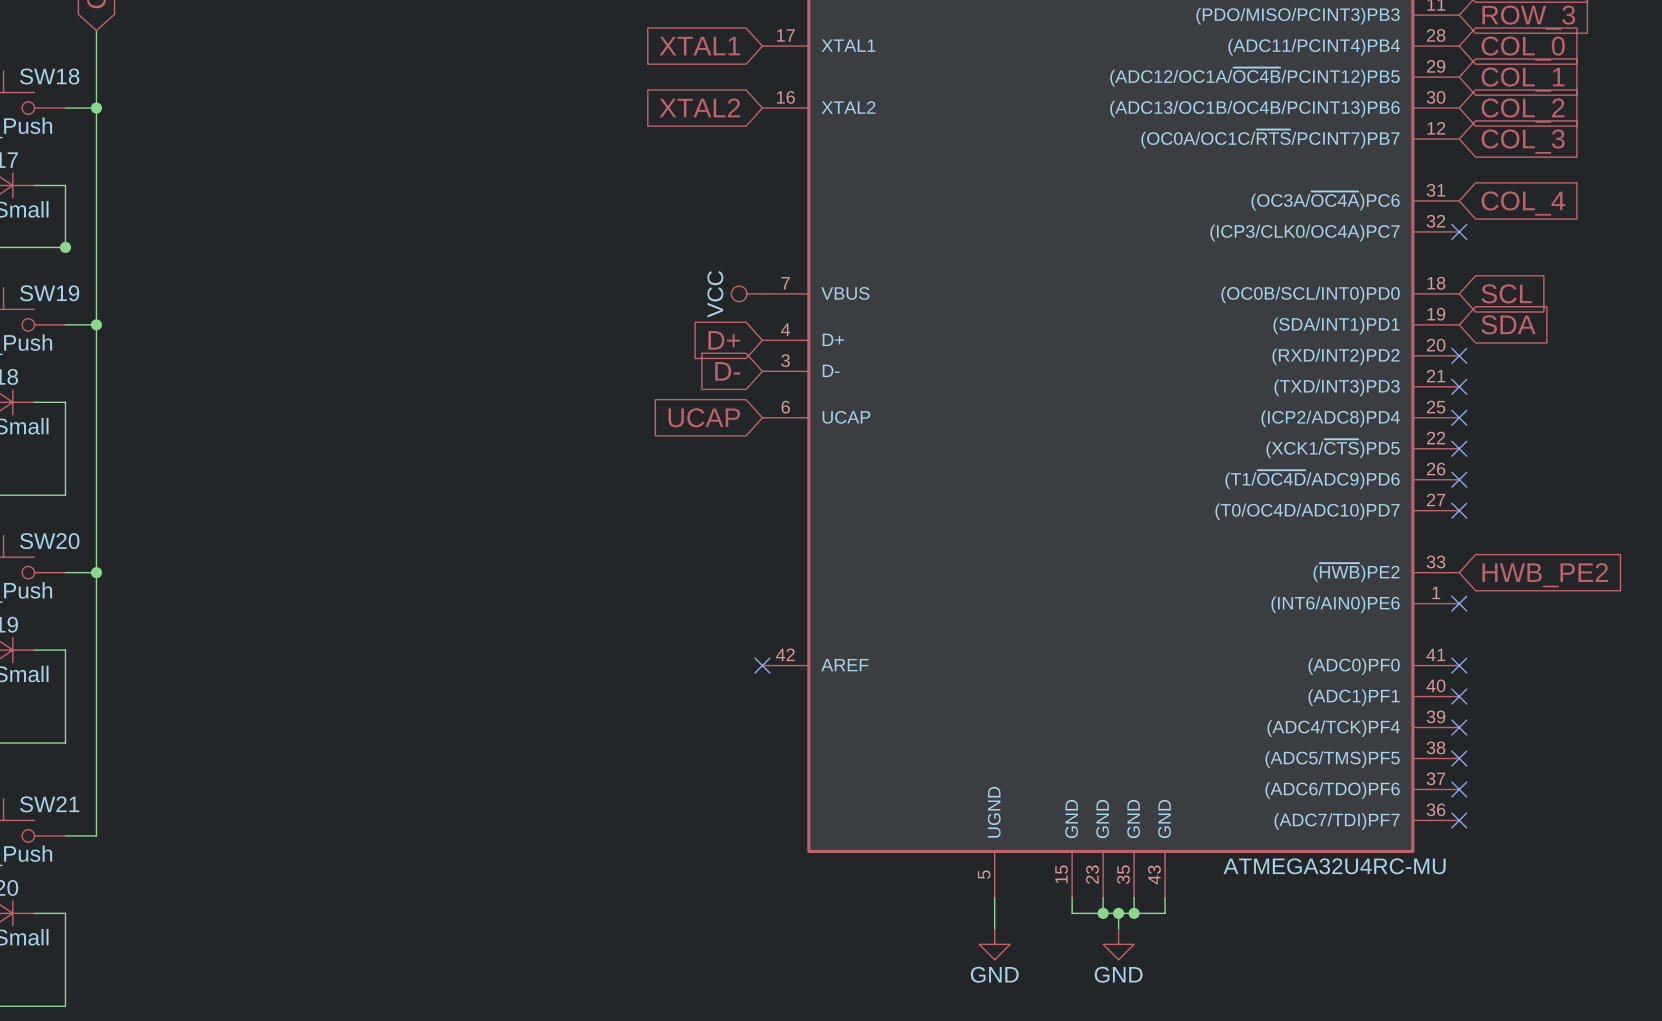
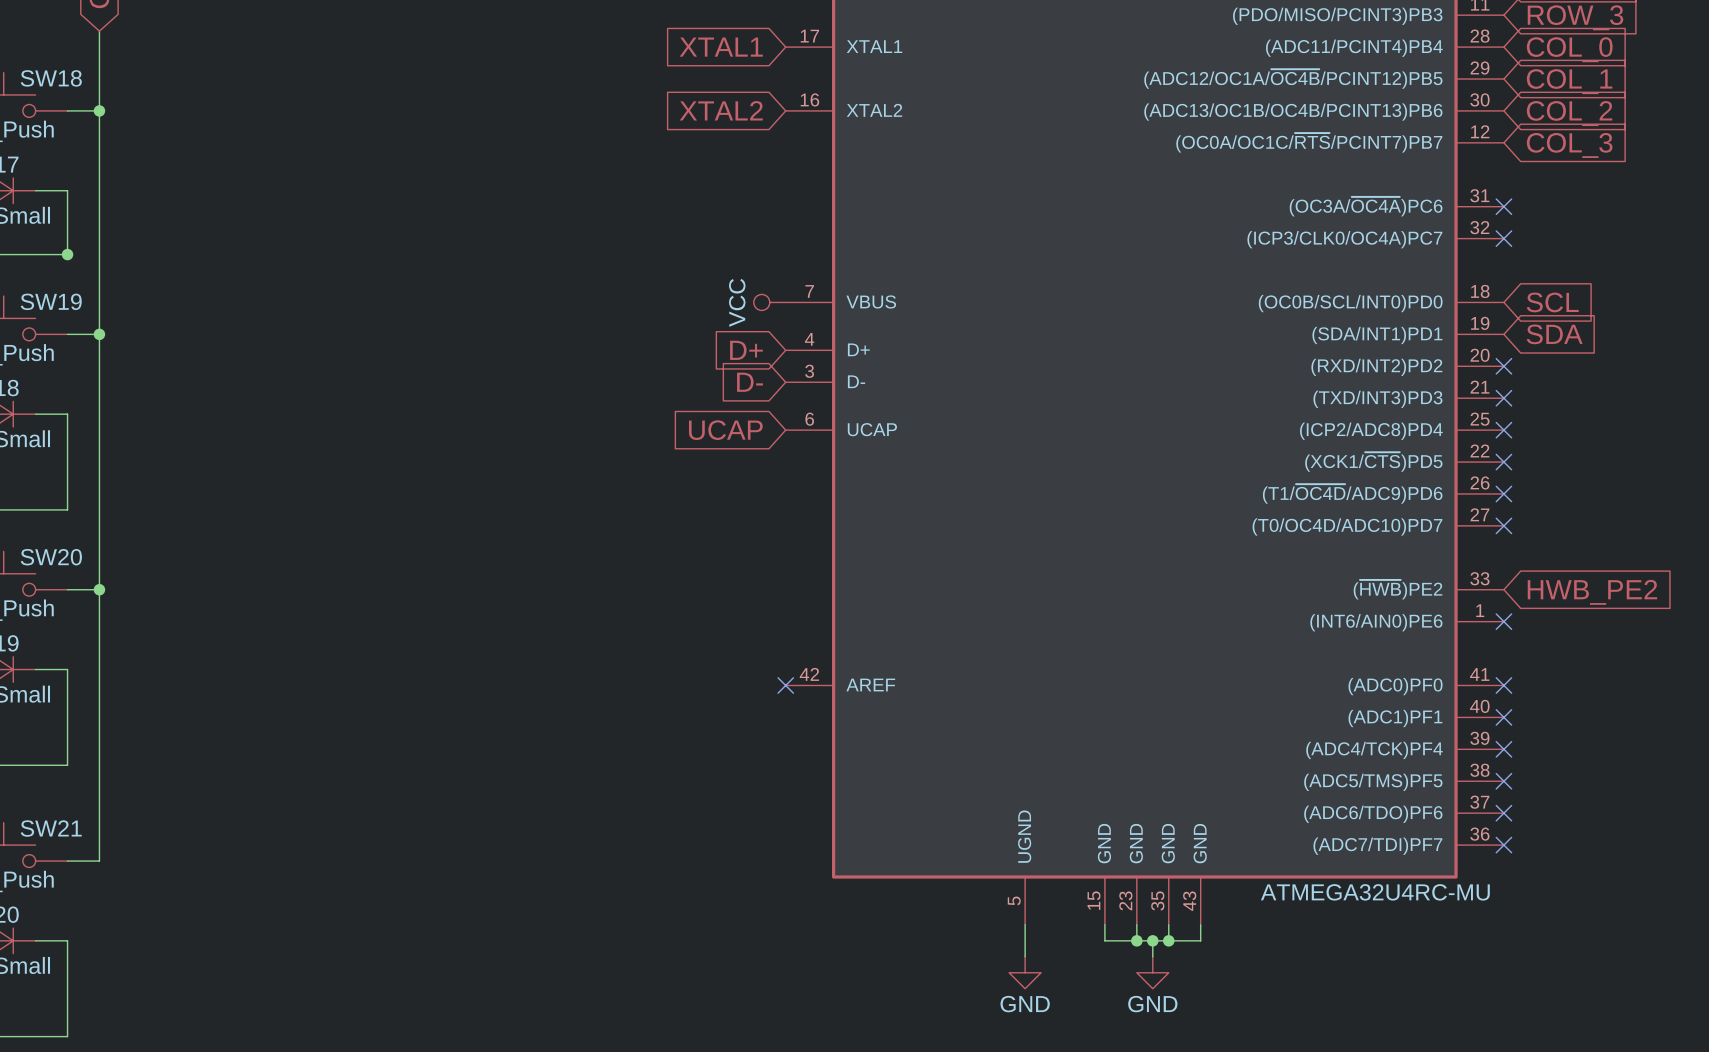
no-connect mark: none -> (1503, 206)
global label: COL_4 (1523, 203) -> none

